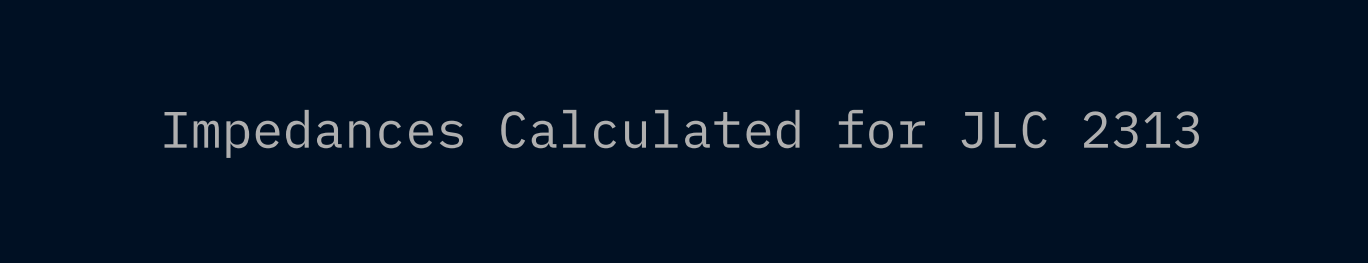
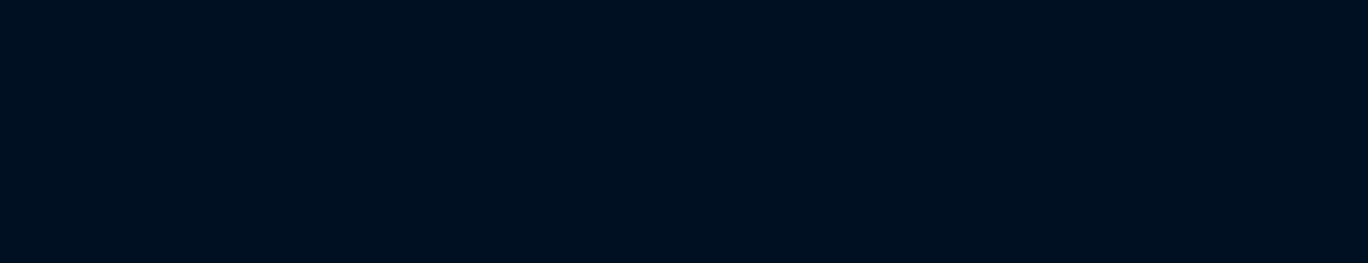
text: Impedances Calculated for JLC 2313 (681, 133) -> none

